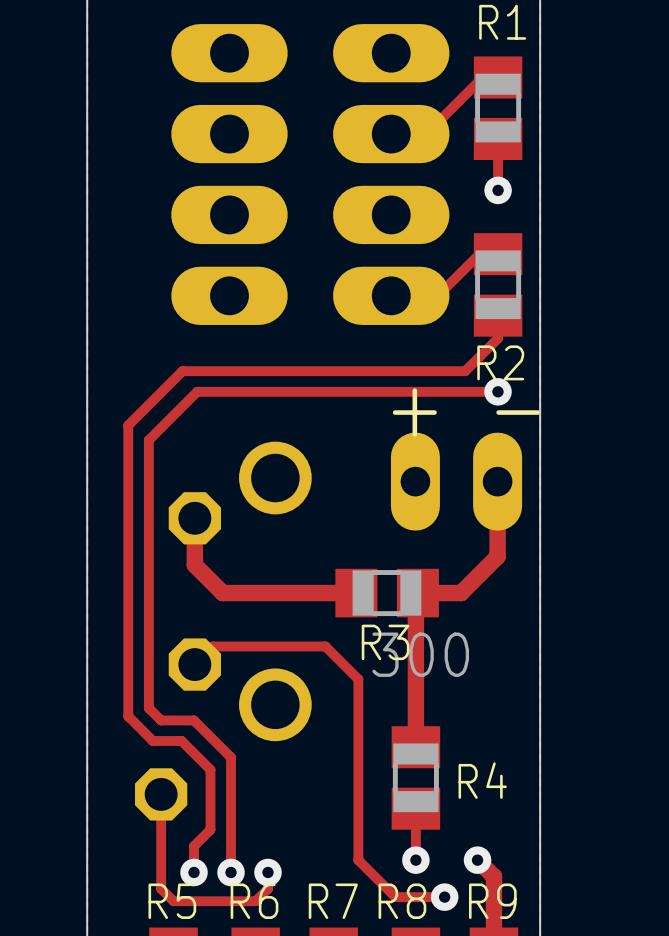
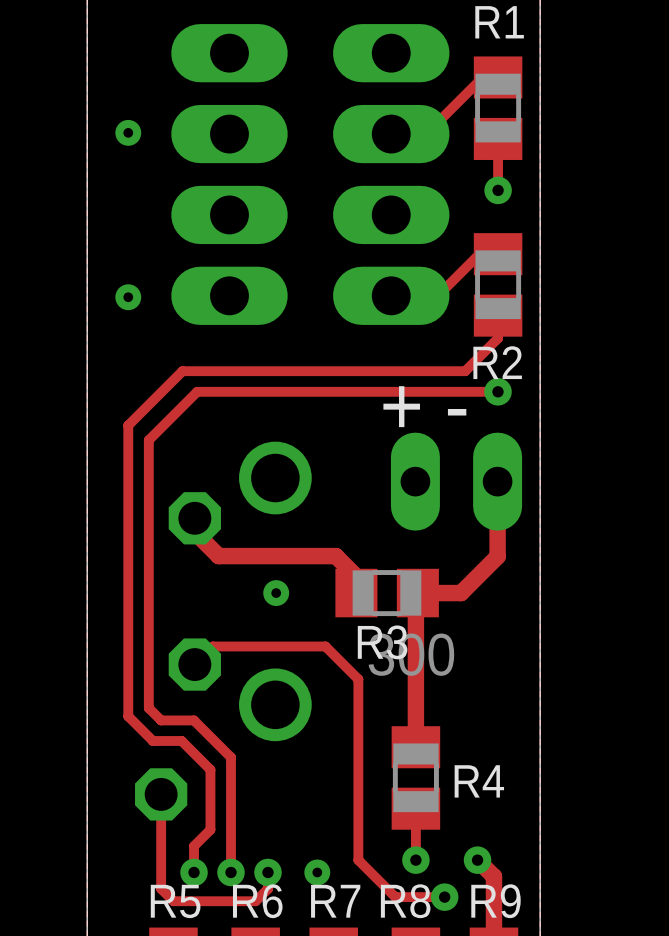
via: none -> (128, 132)
via: none -> (128, 297)
track: (194, 532) (194, 565) (222, 593) (356, 593) -> (194, 532) (218, 556) (335, 556) (356, 576) (356, 593)
via: none -> (276, 593)
via: none -> (317, 872)

